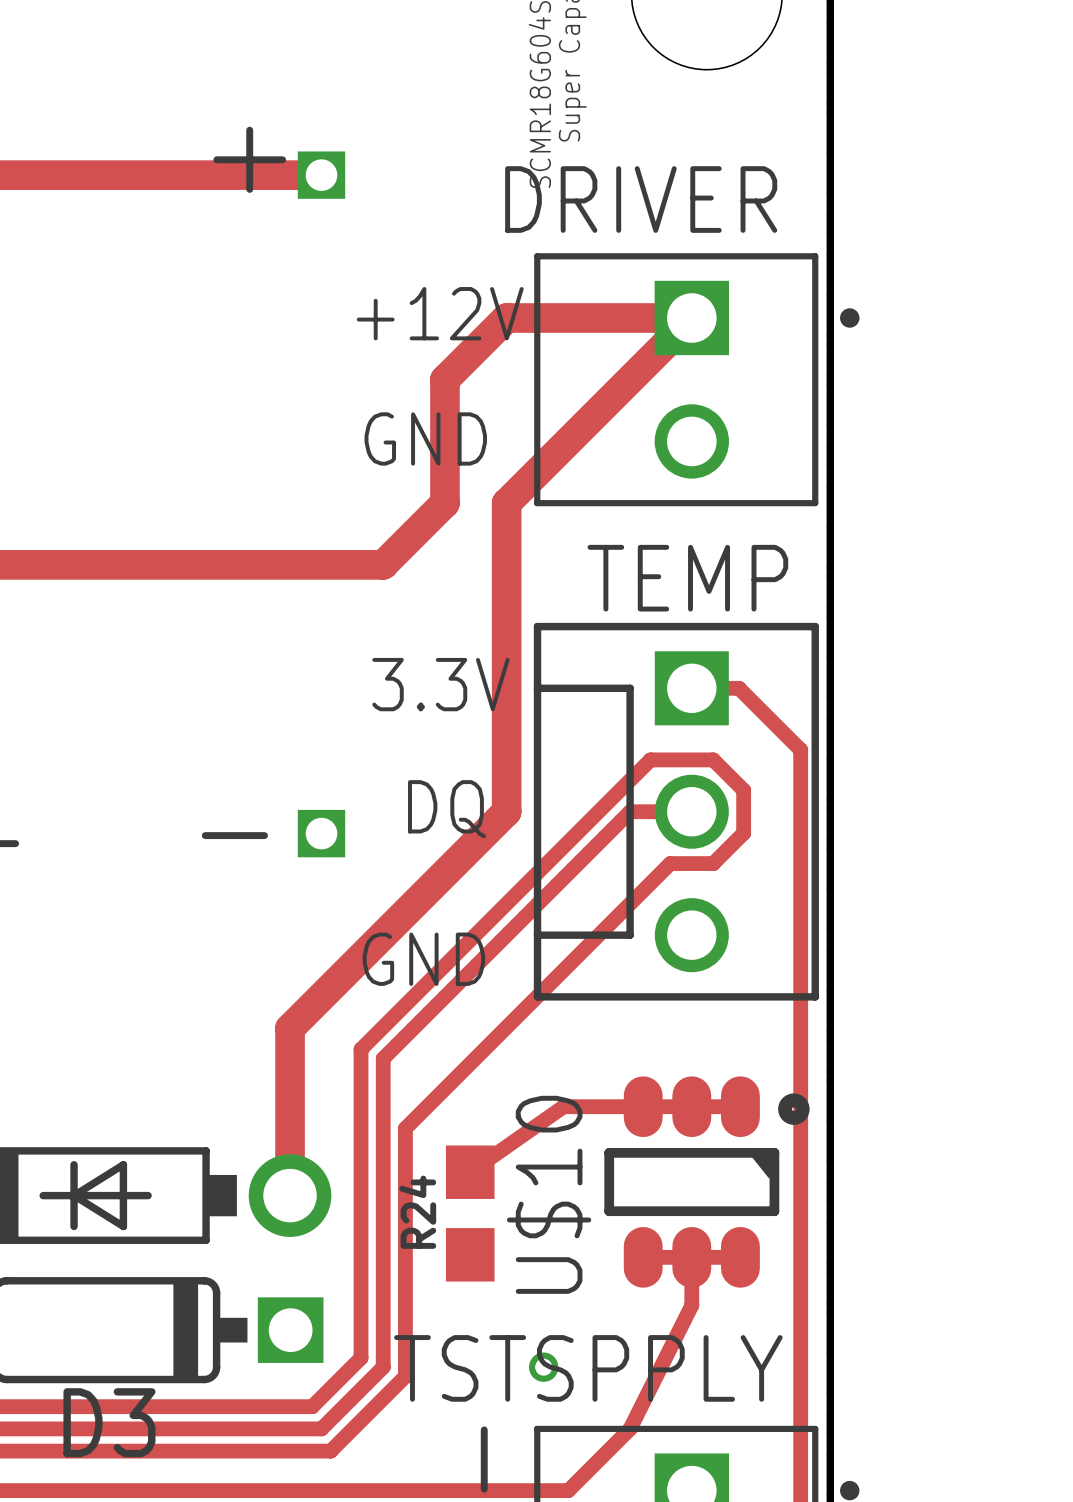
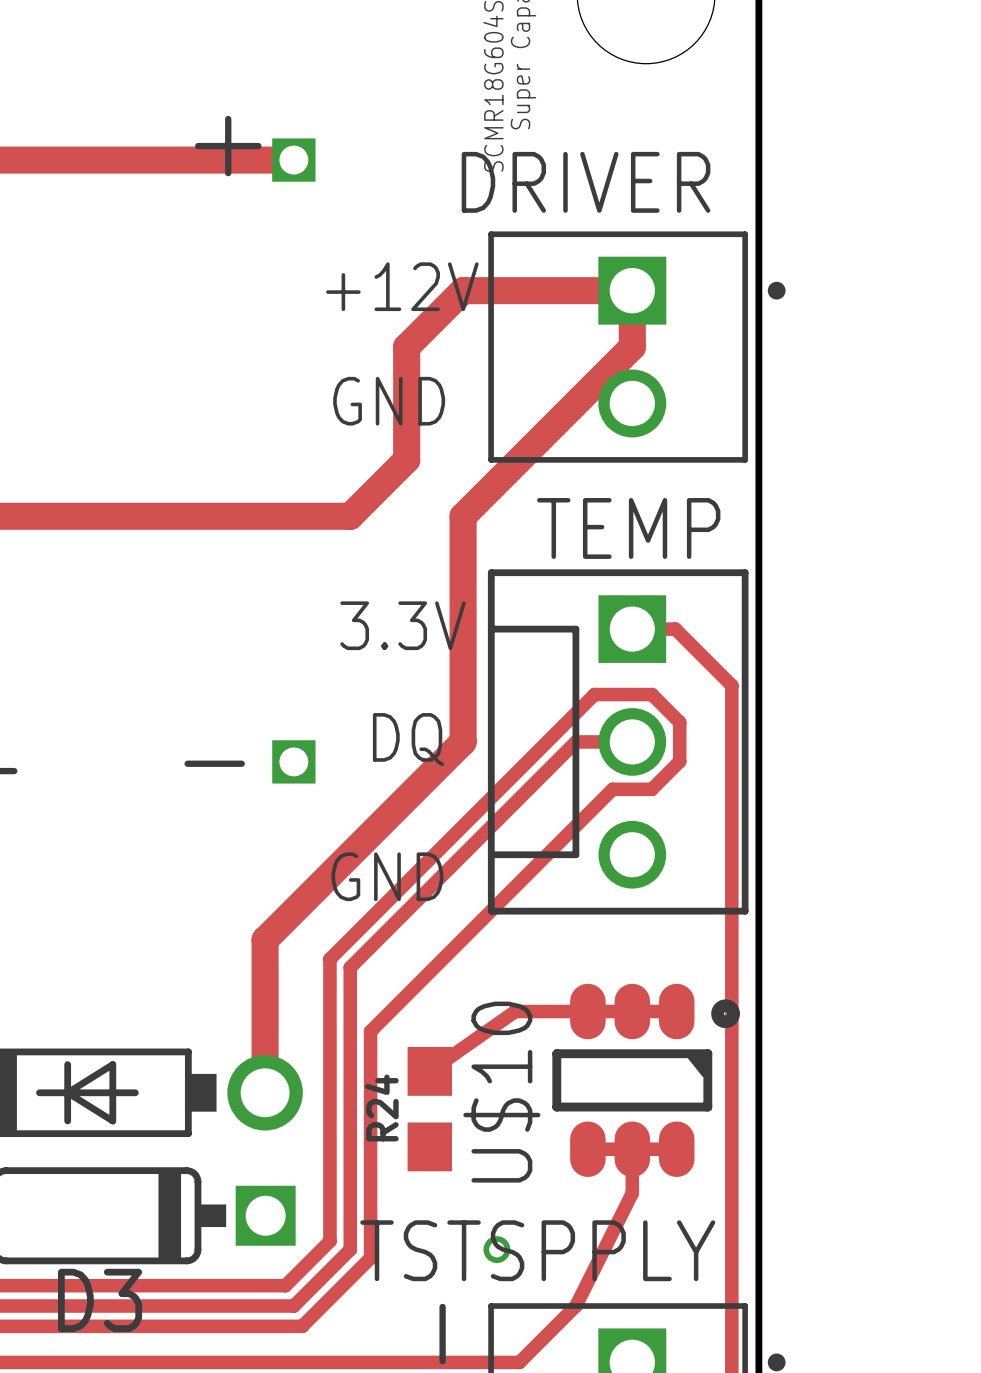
track: (691, 318) (506, 503) (506, 564) -> (632, 290) (632, 347) (463, 516)

